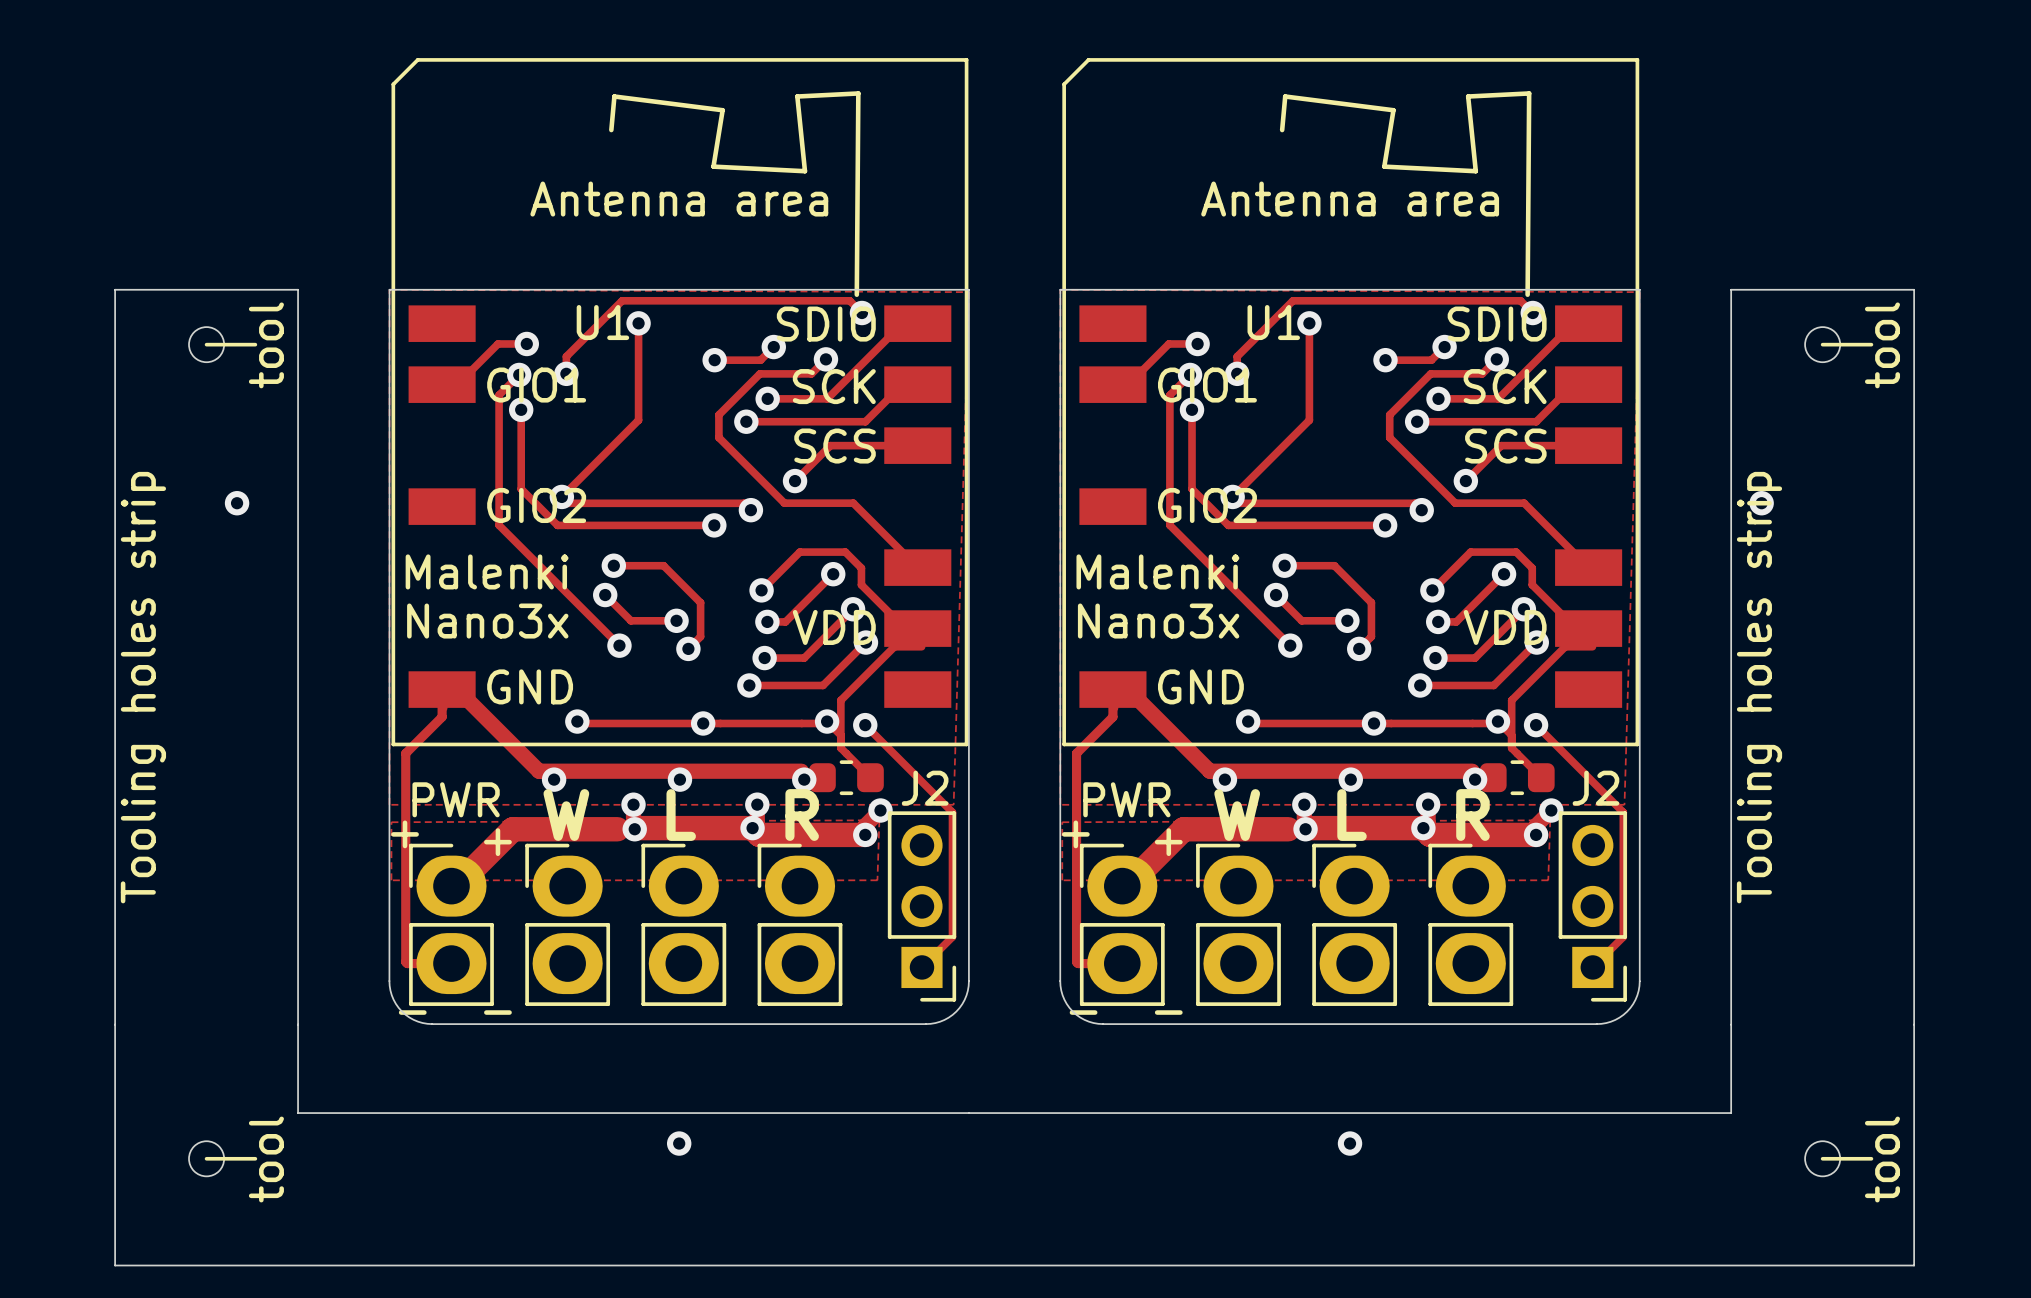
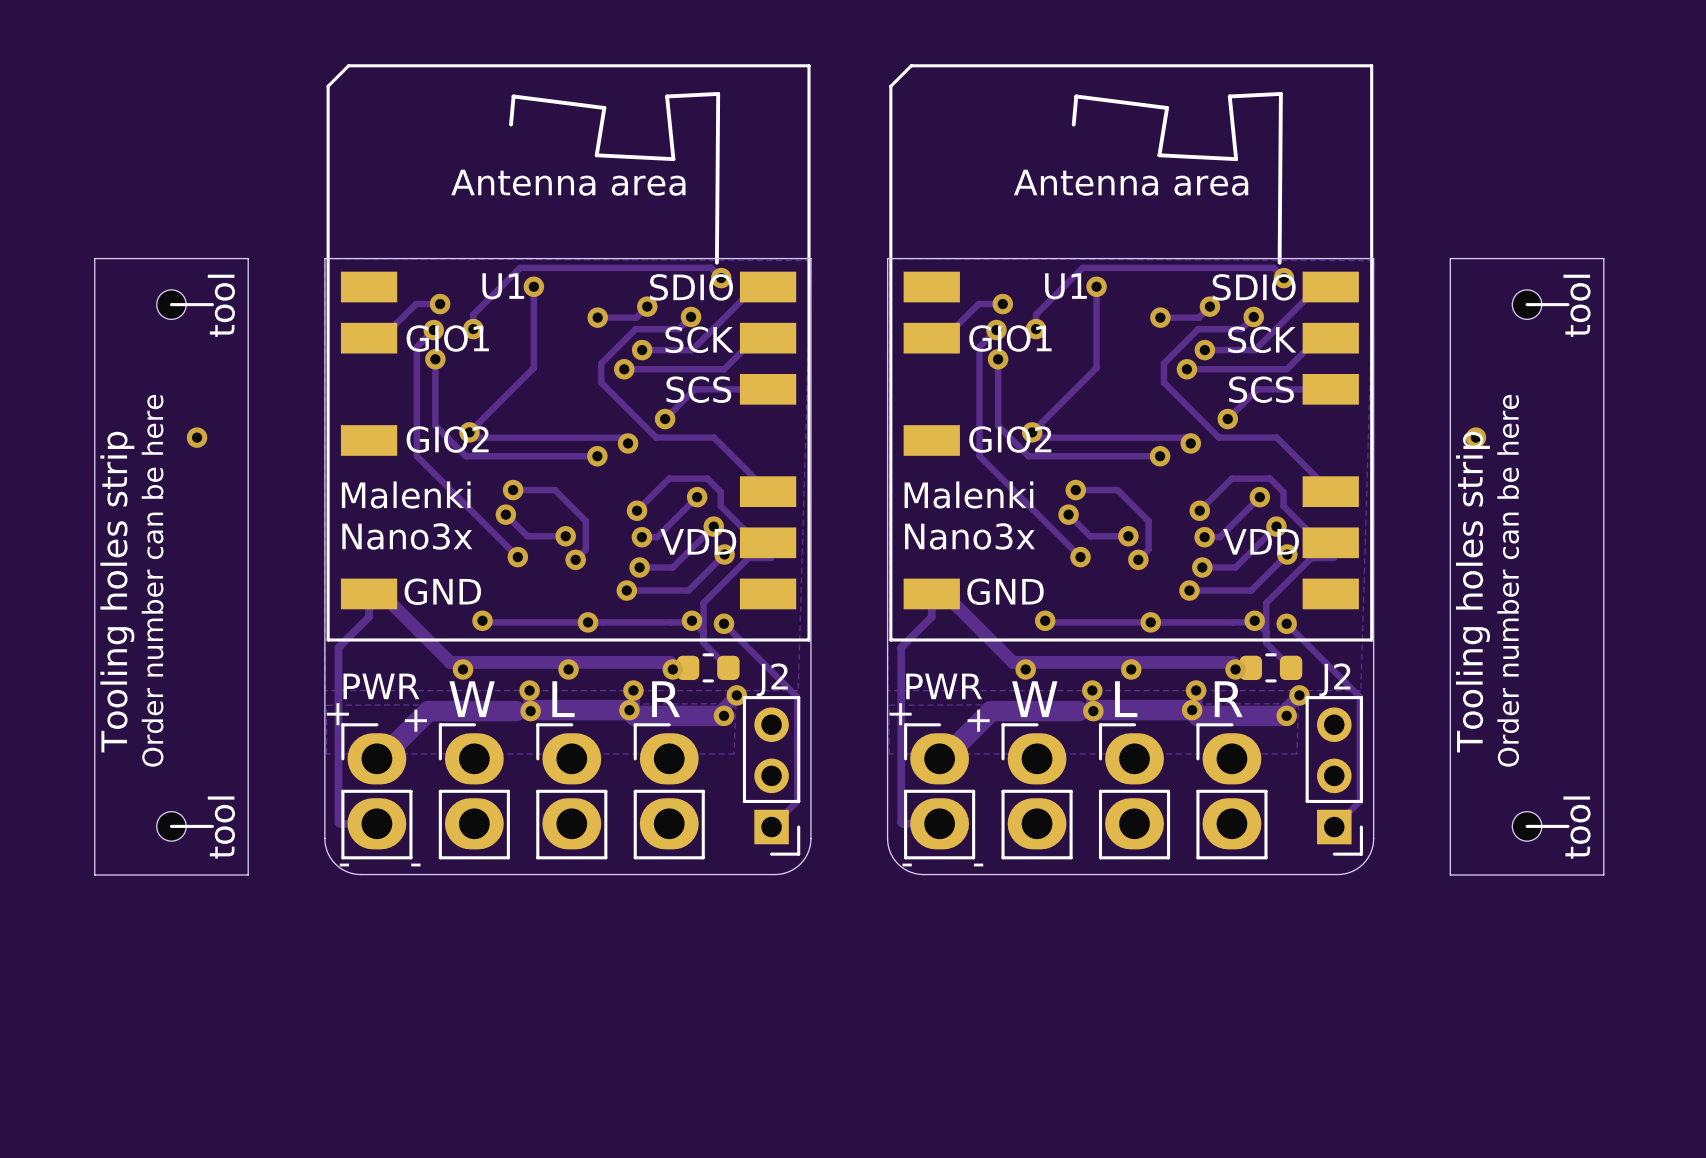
text: none -> Order number can be here (152, 580)
text: none -> Order number can be here (1508, 580)
board edge: (115, 1024) (115, 1265) (1914, 1265) (1914, 1024) -> (94, 874) (248, 874)
board edge: (298, 1024) (298, 1113) (1731, 1113) (1731, 1024) -> (1603, 874) (1450, 874)
via: (679, 1143) -> none
via: (1350, 1143) -> none
part position: (223, 1158) -> (185, 826)
part position: (1839, 1158) -> (1540, 826)

